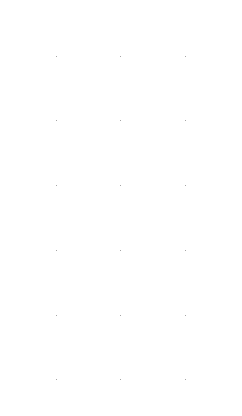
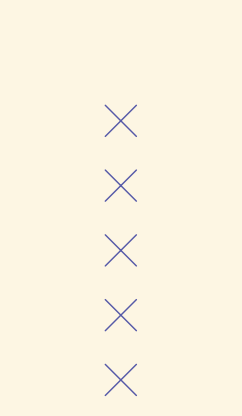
no-connect mark: none -> (120, 120)
no-connect mark: none -> (120, 185)
no-connect mark: none -> (120, 250)
no-connect mark: none -> (120, 315)
no-connect mark: none -> (120, 379)

